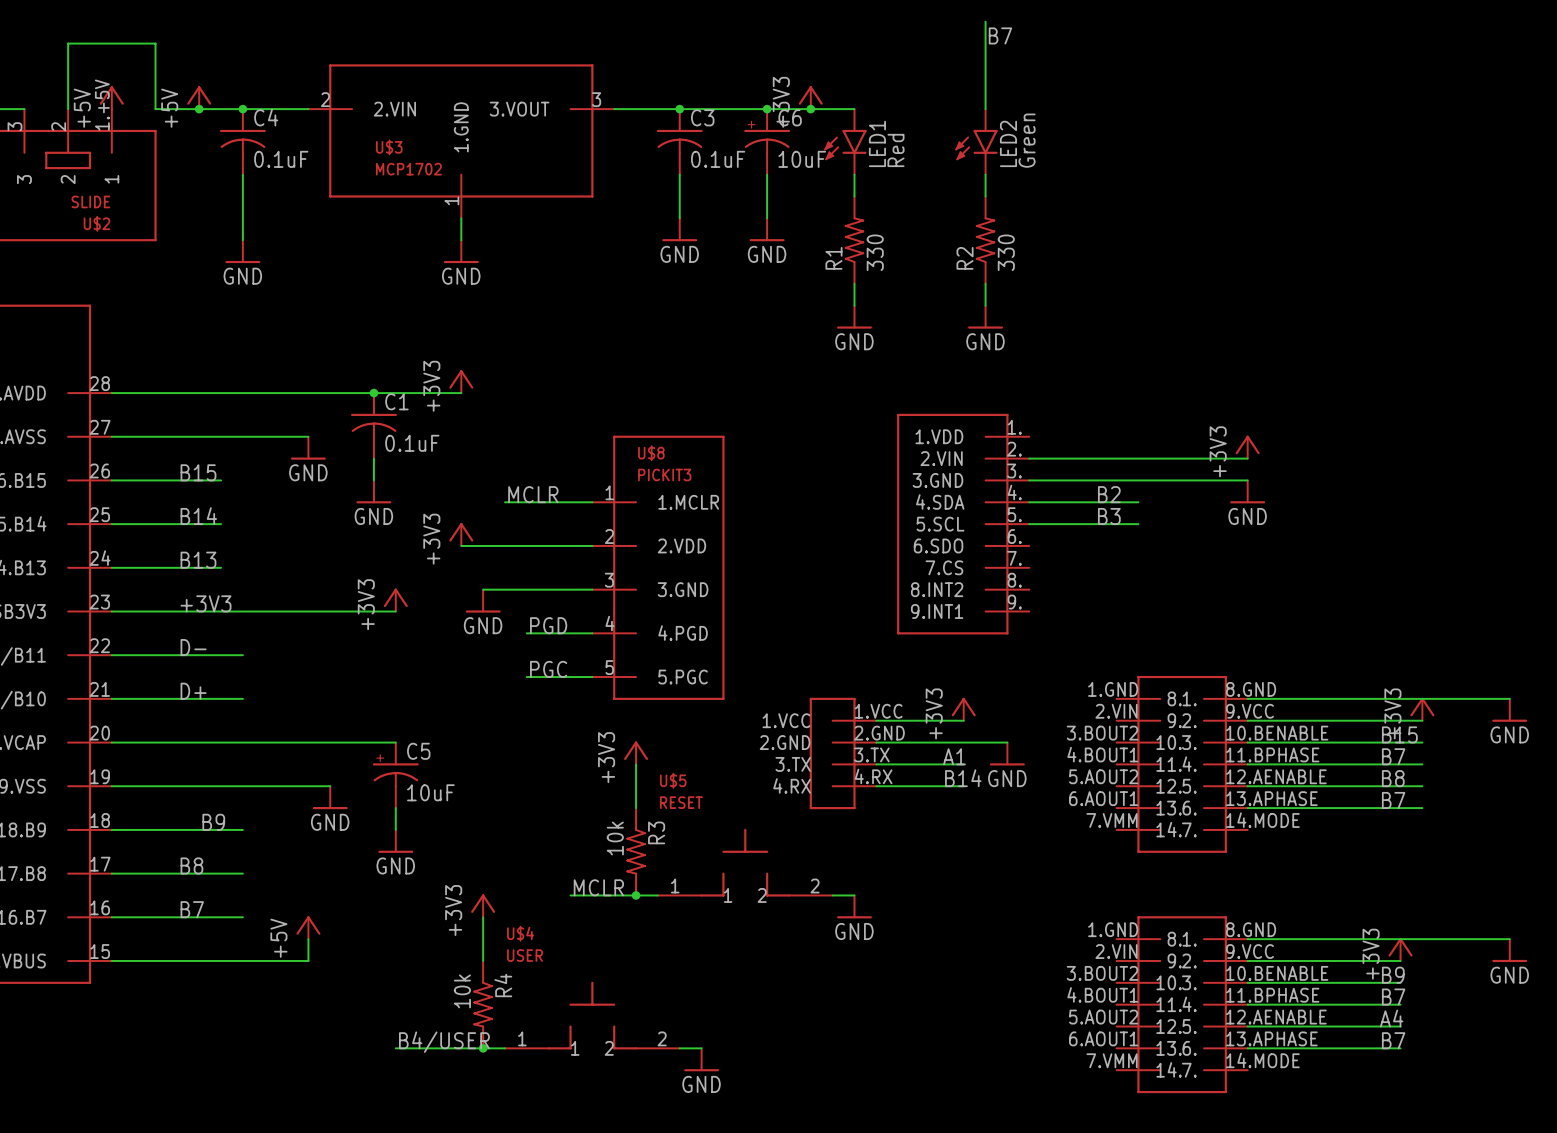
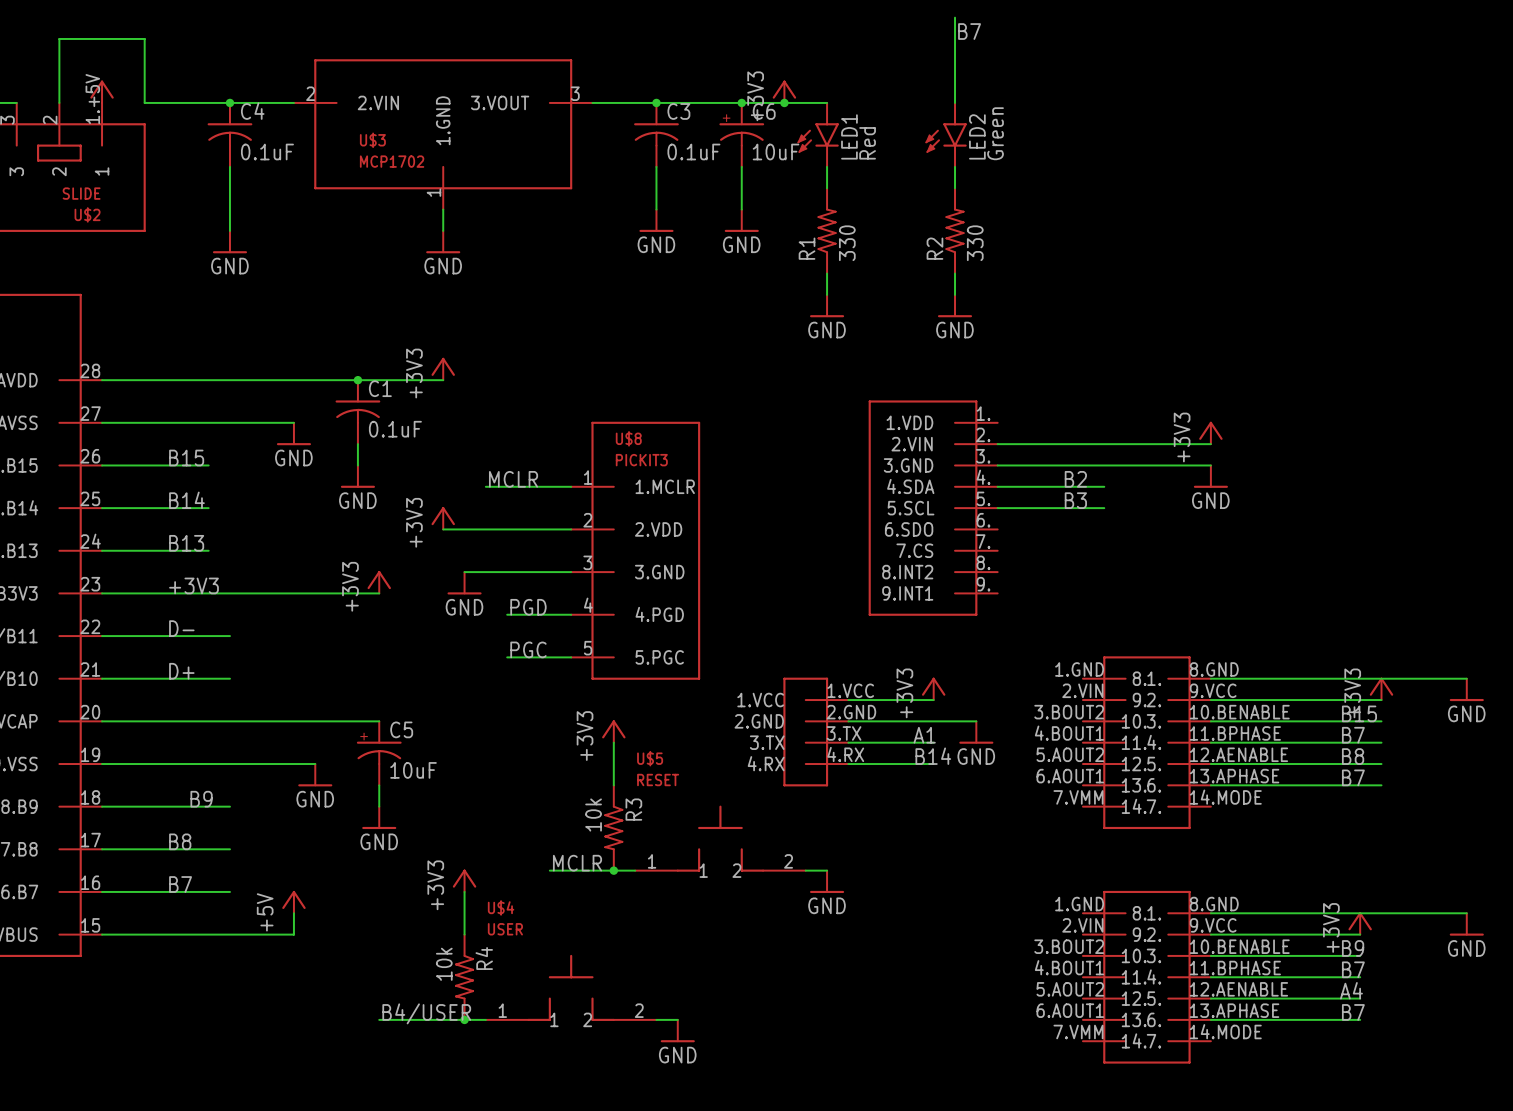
power symbol: +5V (199, 97) -> none
power symbol text: +5V (82, 108) -> none
junction: (199, 109) -> none

